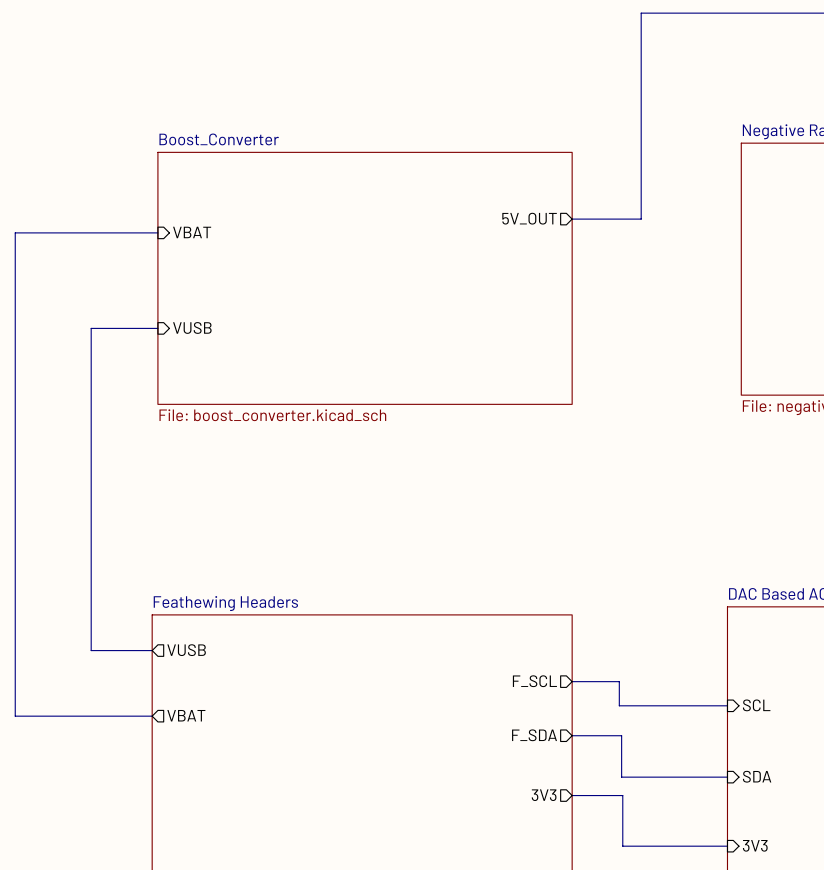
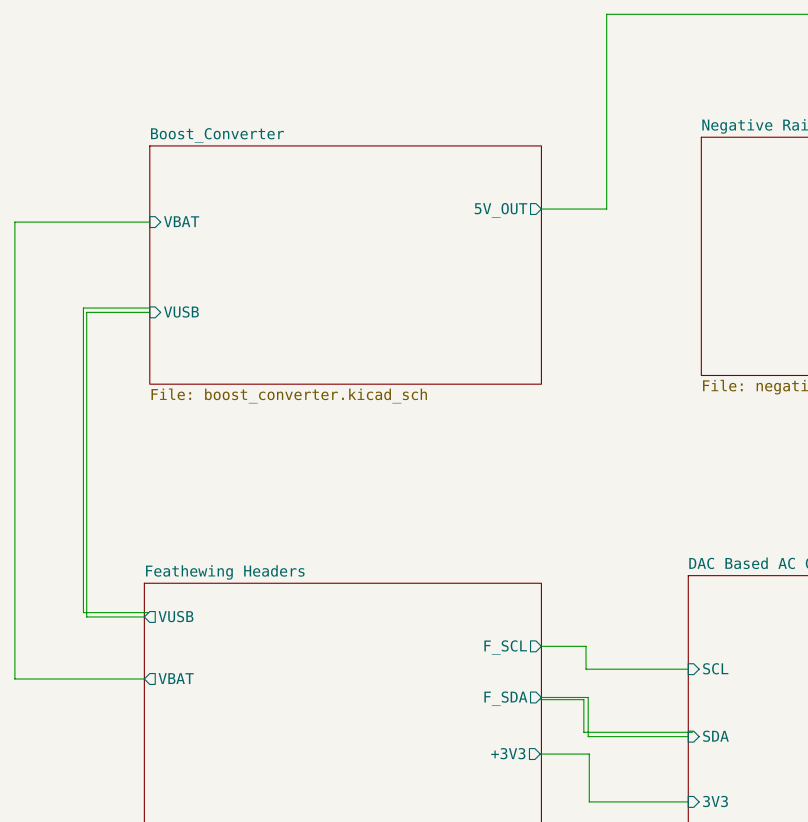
wire: none -> (148, 308) (83, 308) (83, 612) (148, 612)
wire: none -> (540, 699) (583, 699) (583, 732) (692, 732)
sheet pin: 3V3 (544, 795) -> +3V3 (508, 753)

